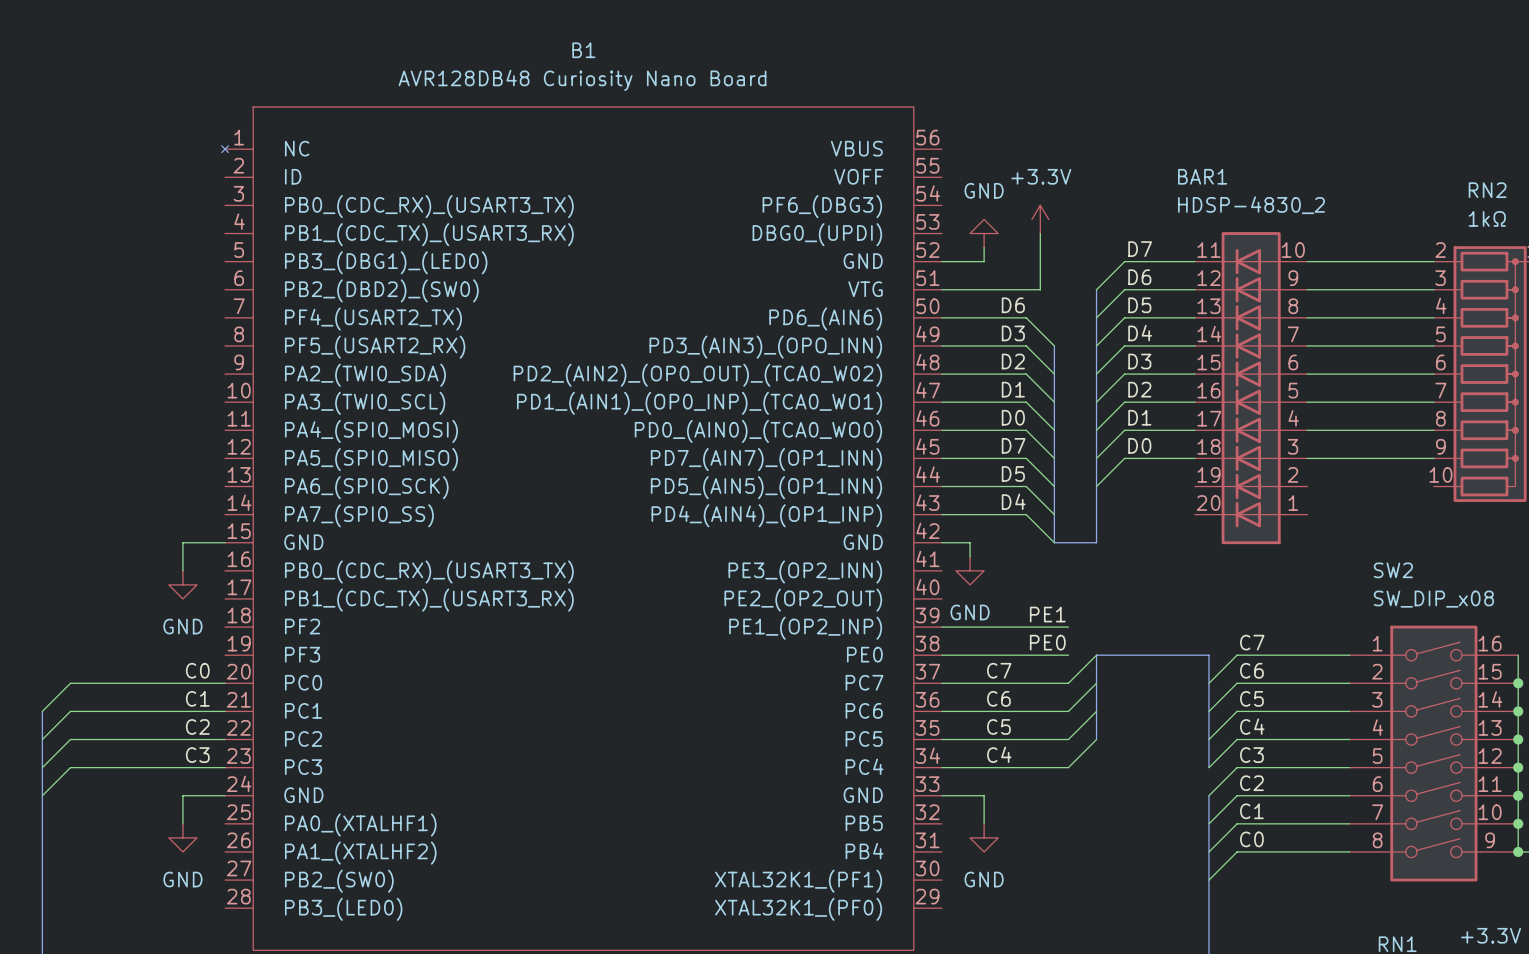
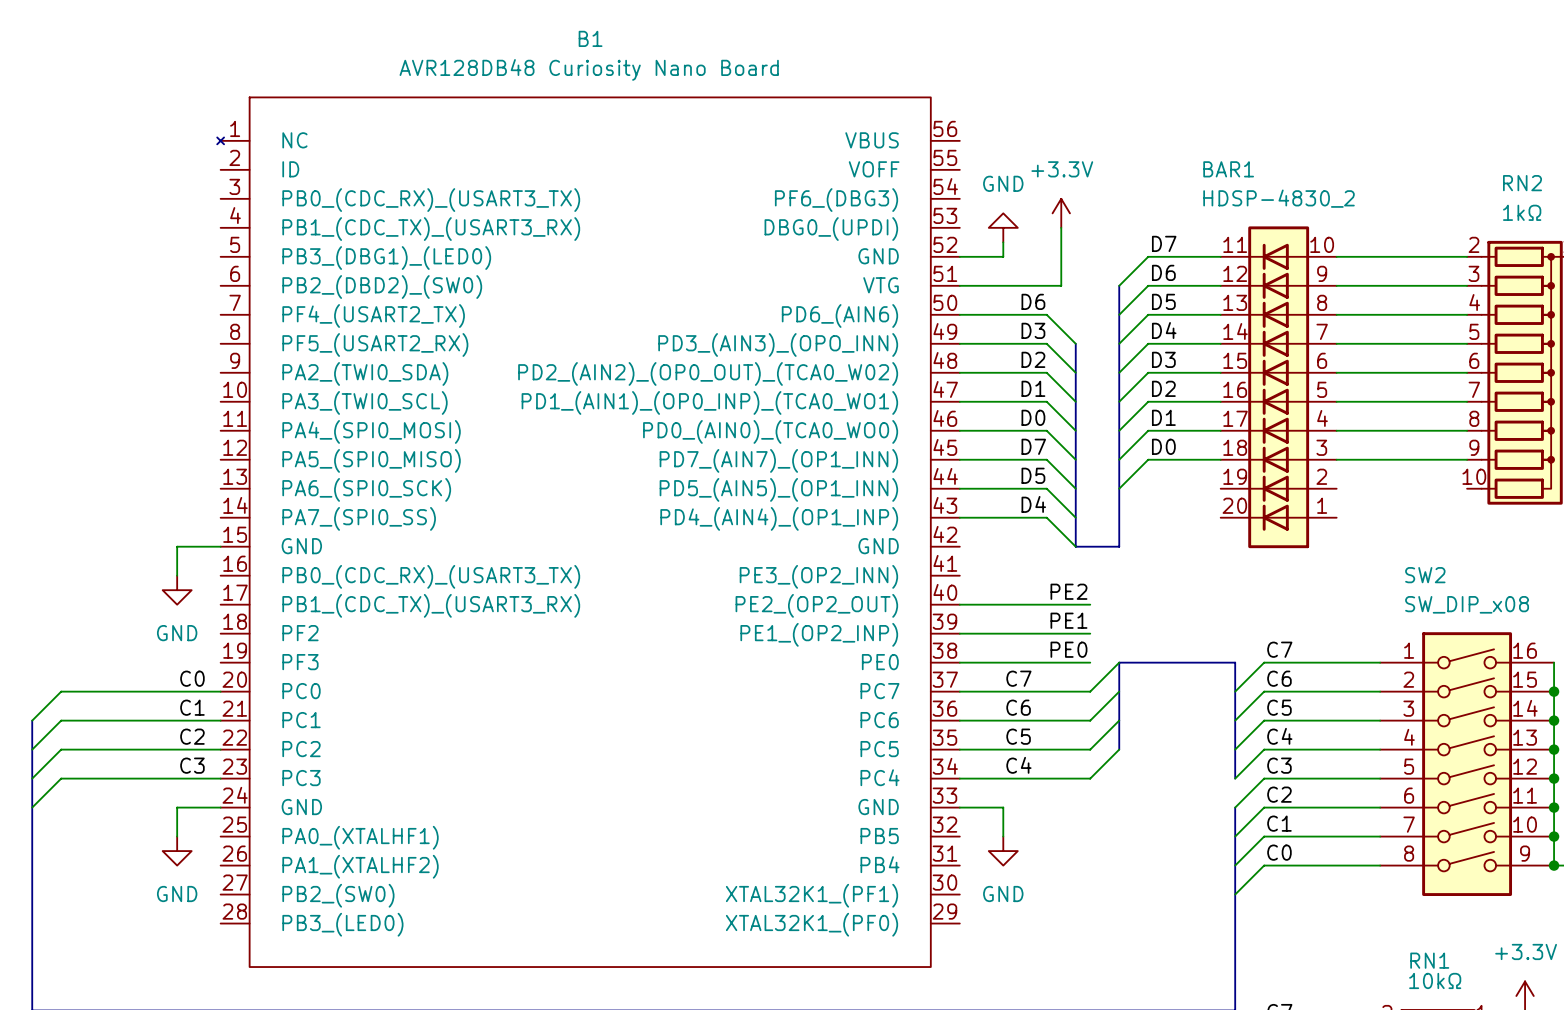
wire: (941, 542) (970, 542) (970, 556) -> none
power symbol: GND (970, 570) -> none
label: none -> PE2 (1068, 591)
wire: none -> (959, 604) (1090, 604)

